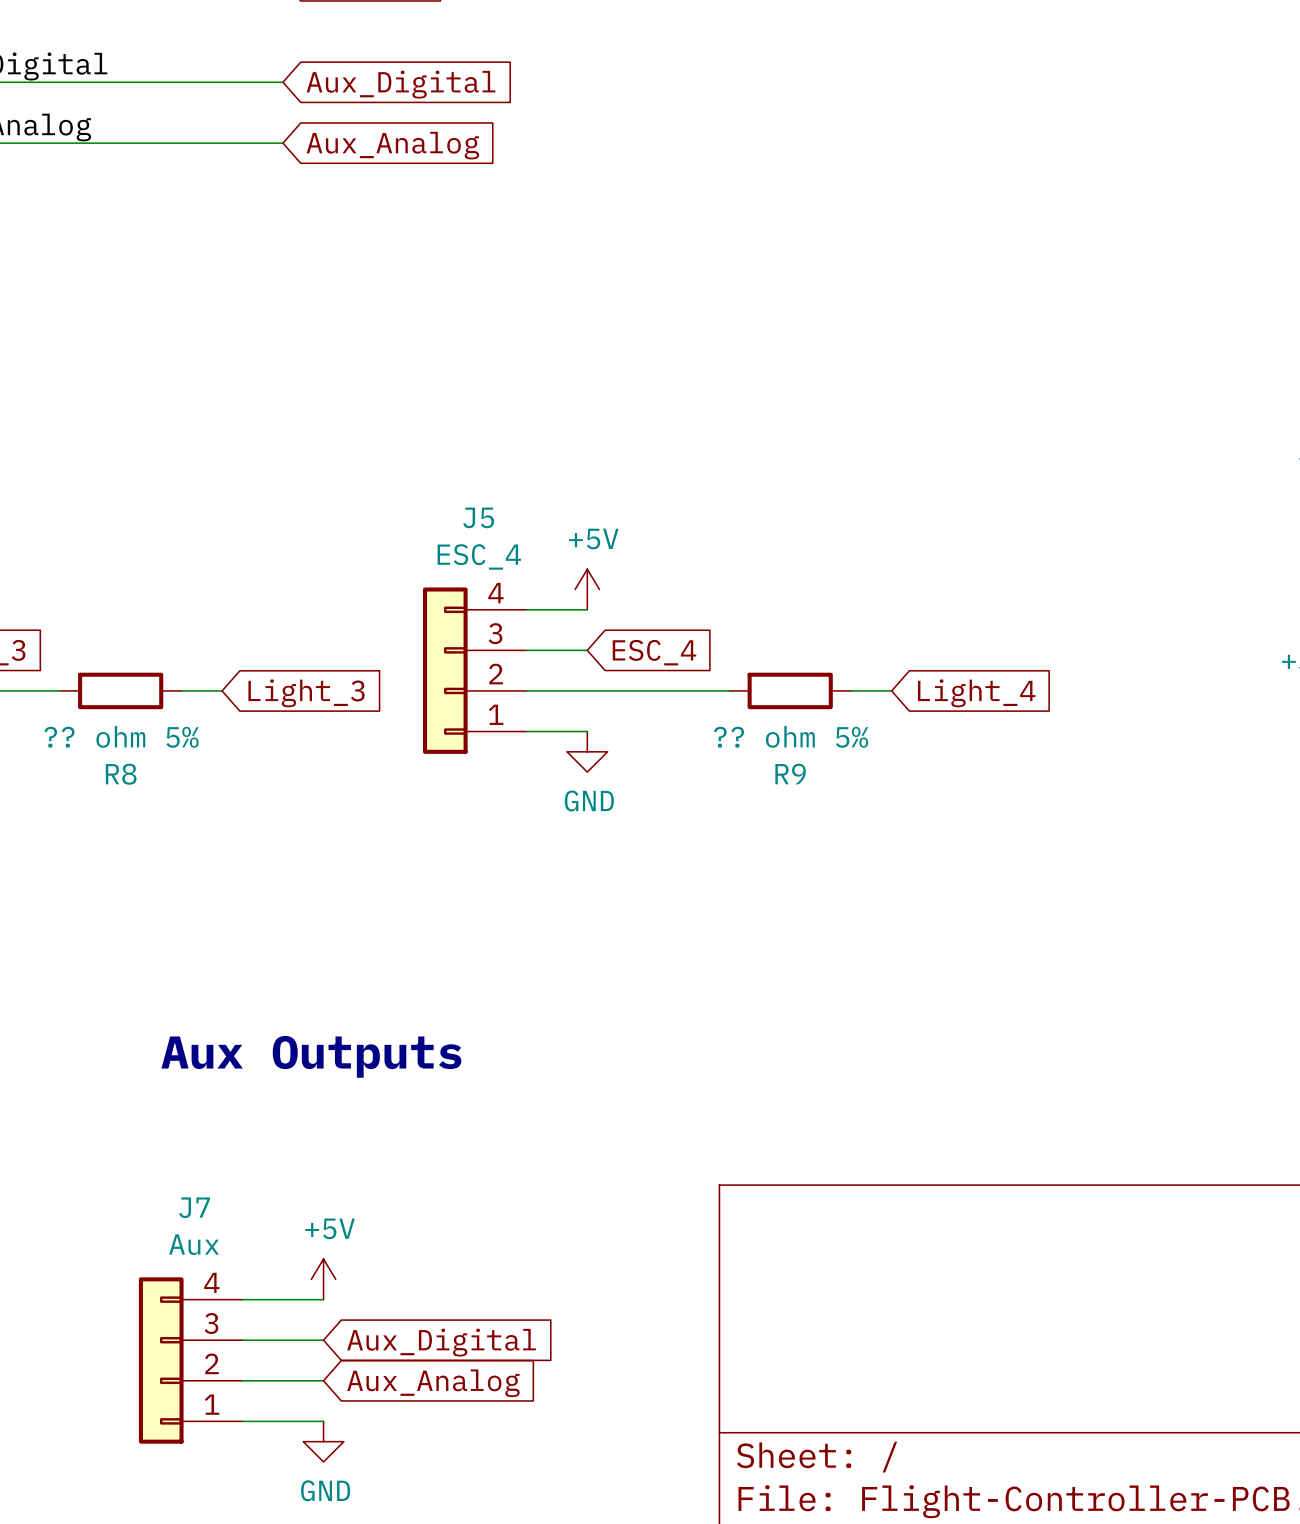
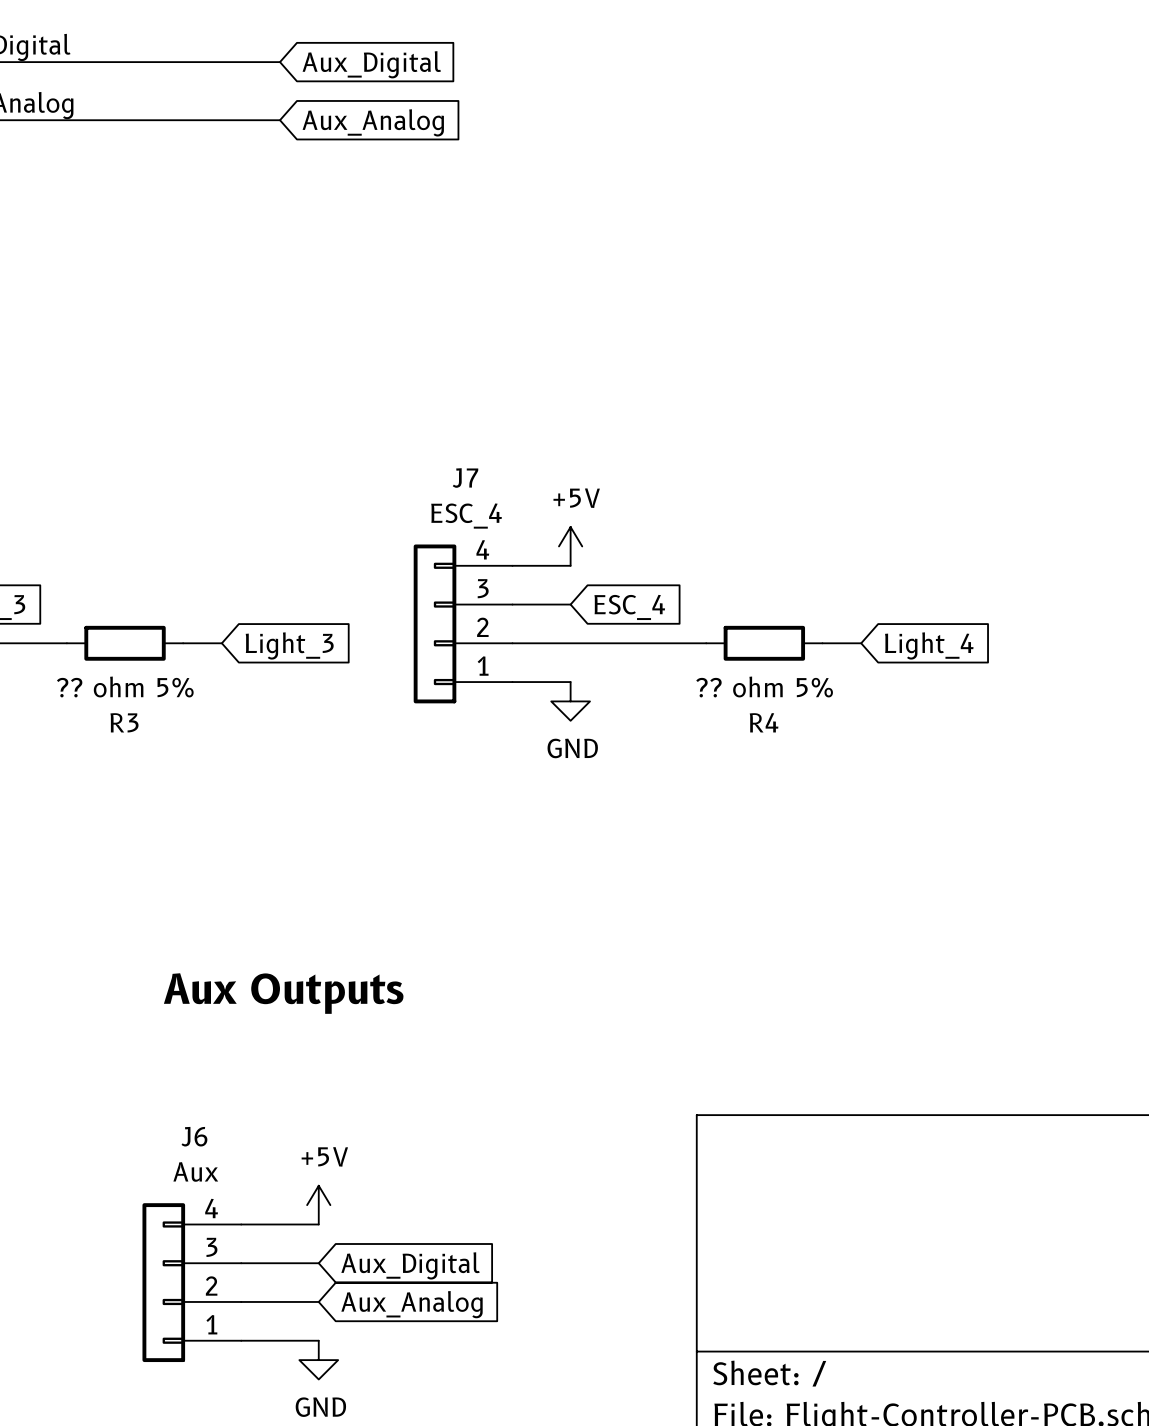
J5 name: J5 (478, 517) -> J7 (465, 478)
R8 name: R8 (121, 774) -> R3 (124, 722)
R9 name: R9 (790, 774) -> R4 (764, 722)
J7 name: J7 (194, 1207) -> J6 (194, 1136)

